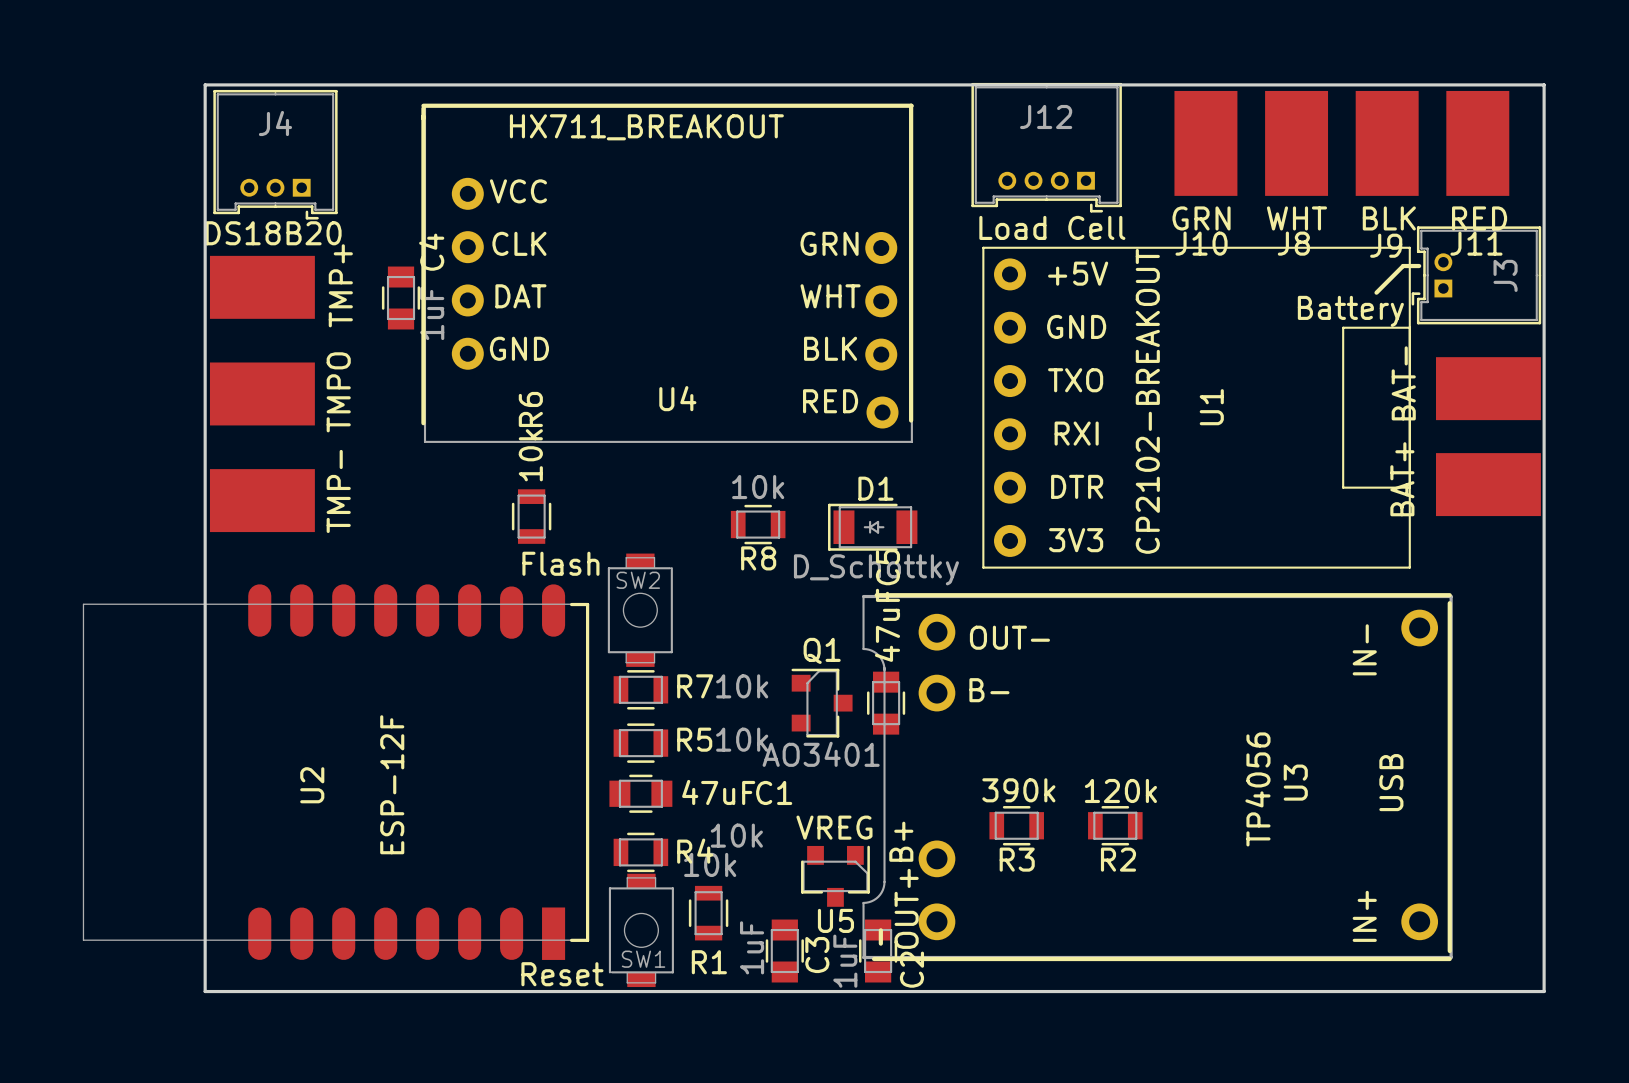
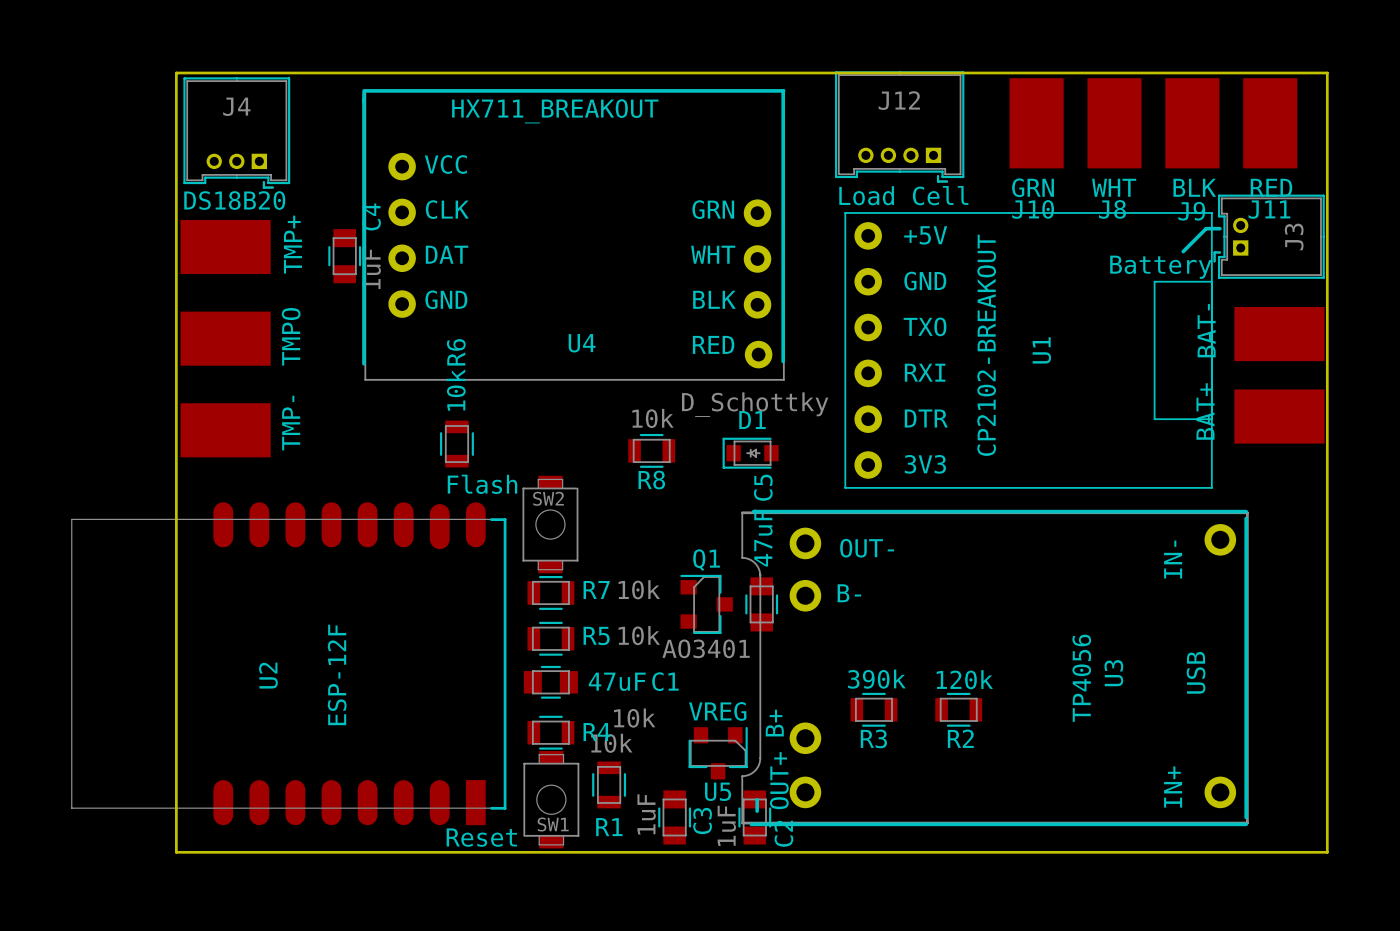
D1 footprint: [828, 503, 918, 551] -> [722, 437, 779, 469]
D1 value position: D_Schottky (876, 569) -> D_Schottky (755, 404)

